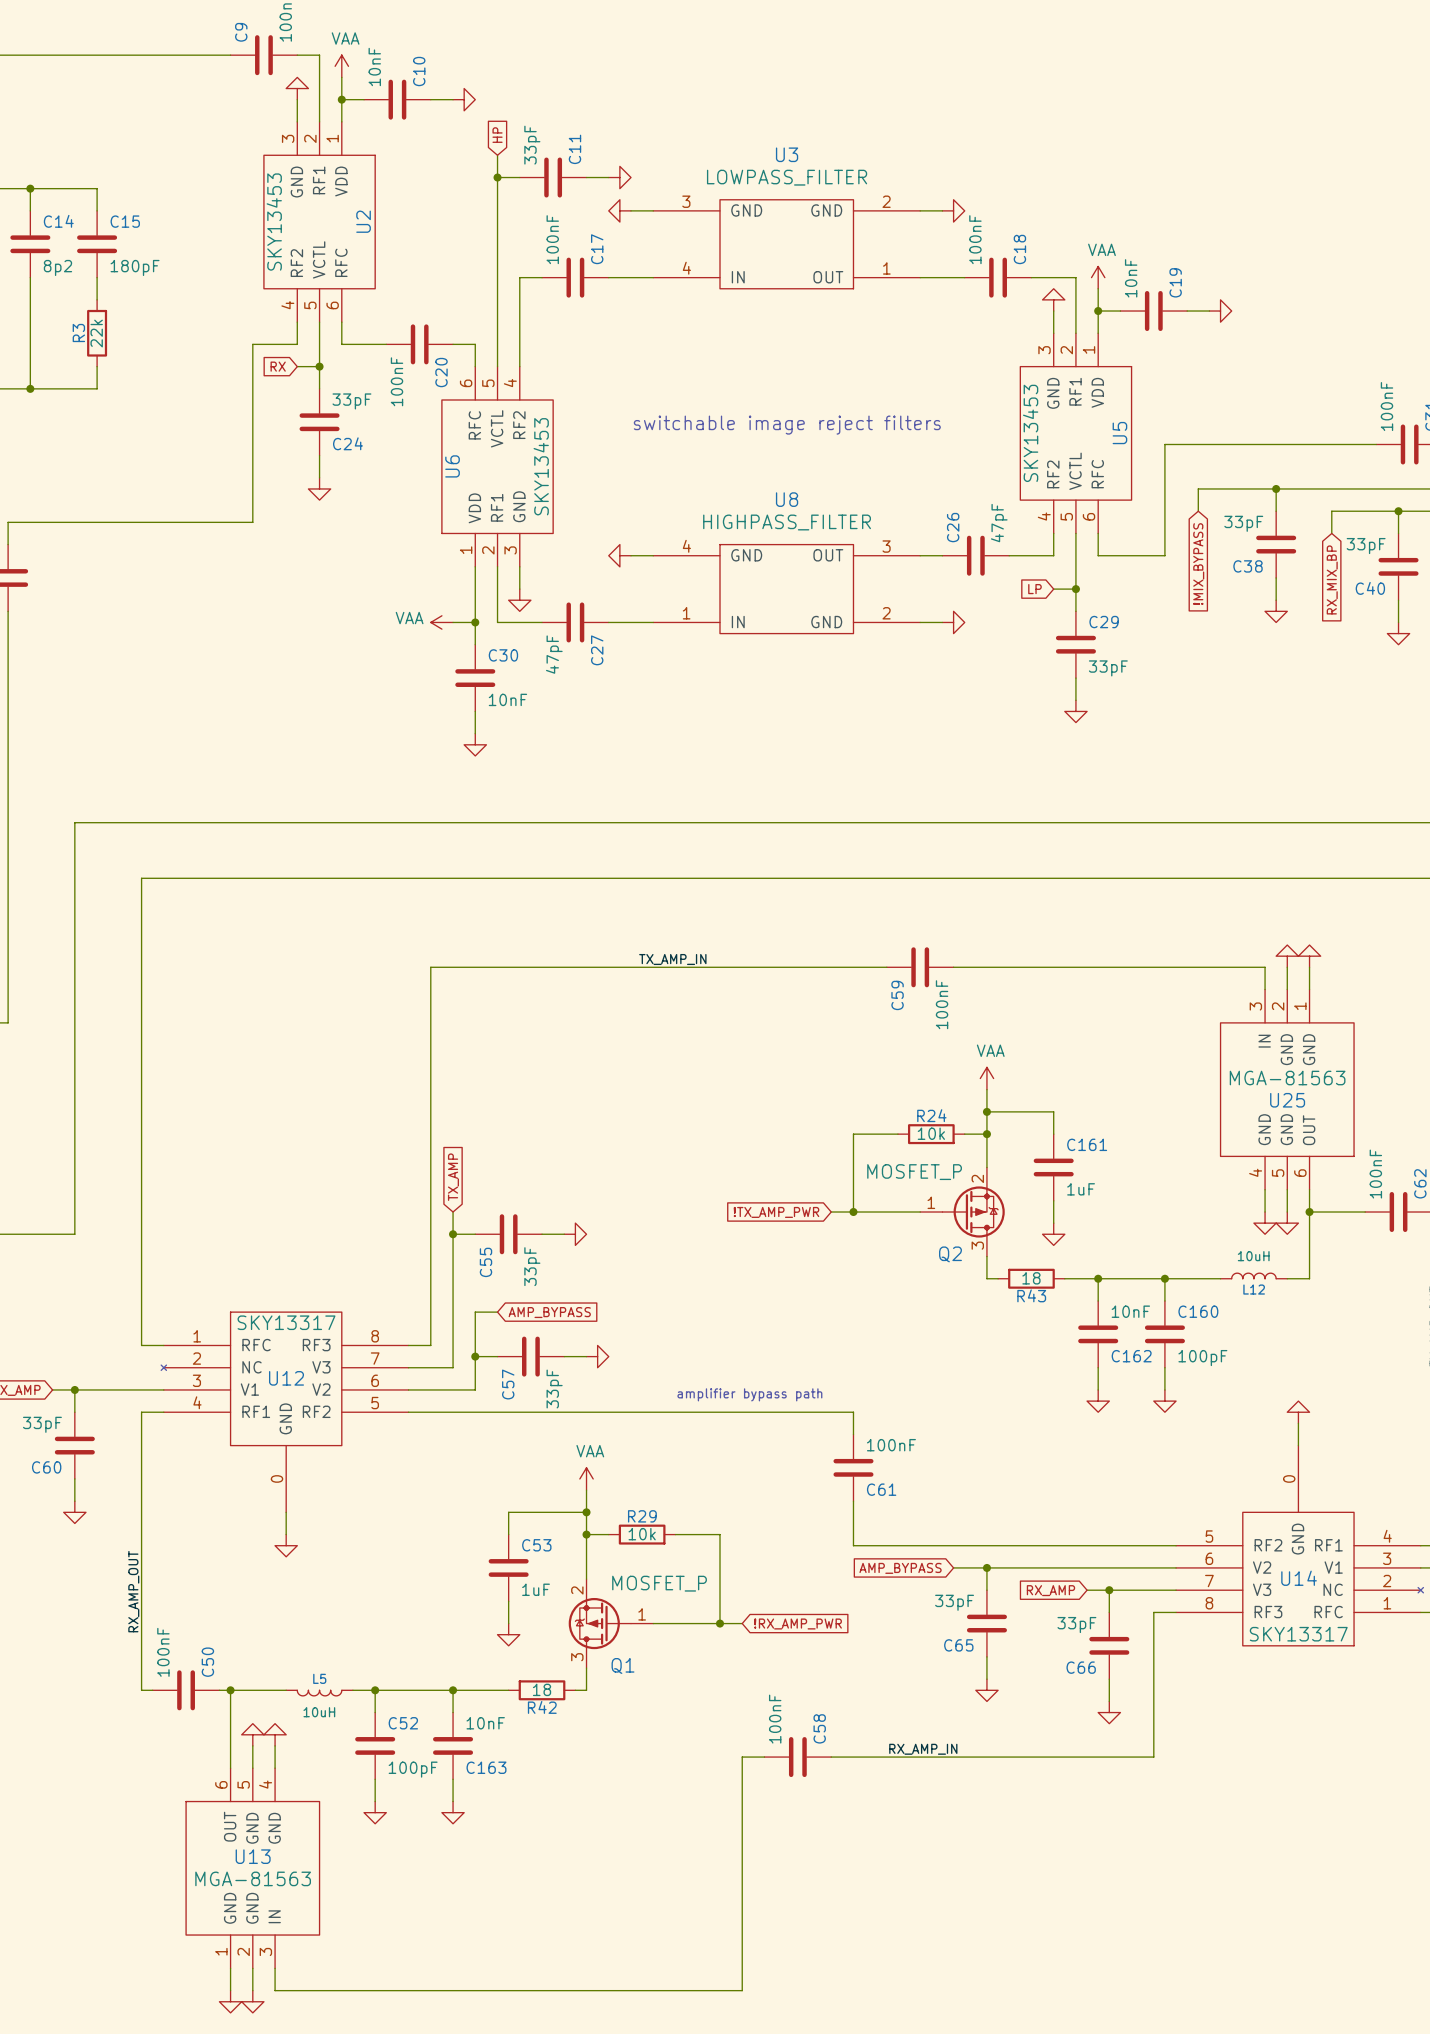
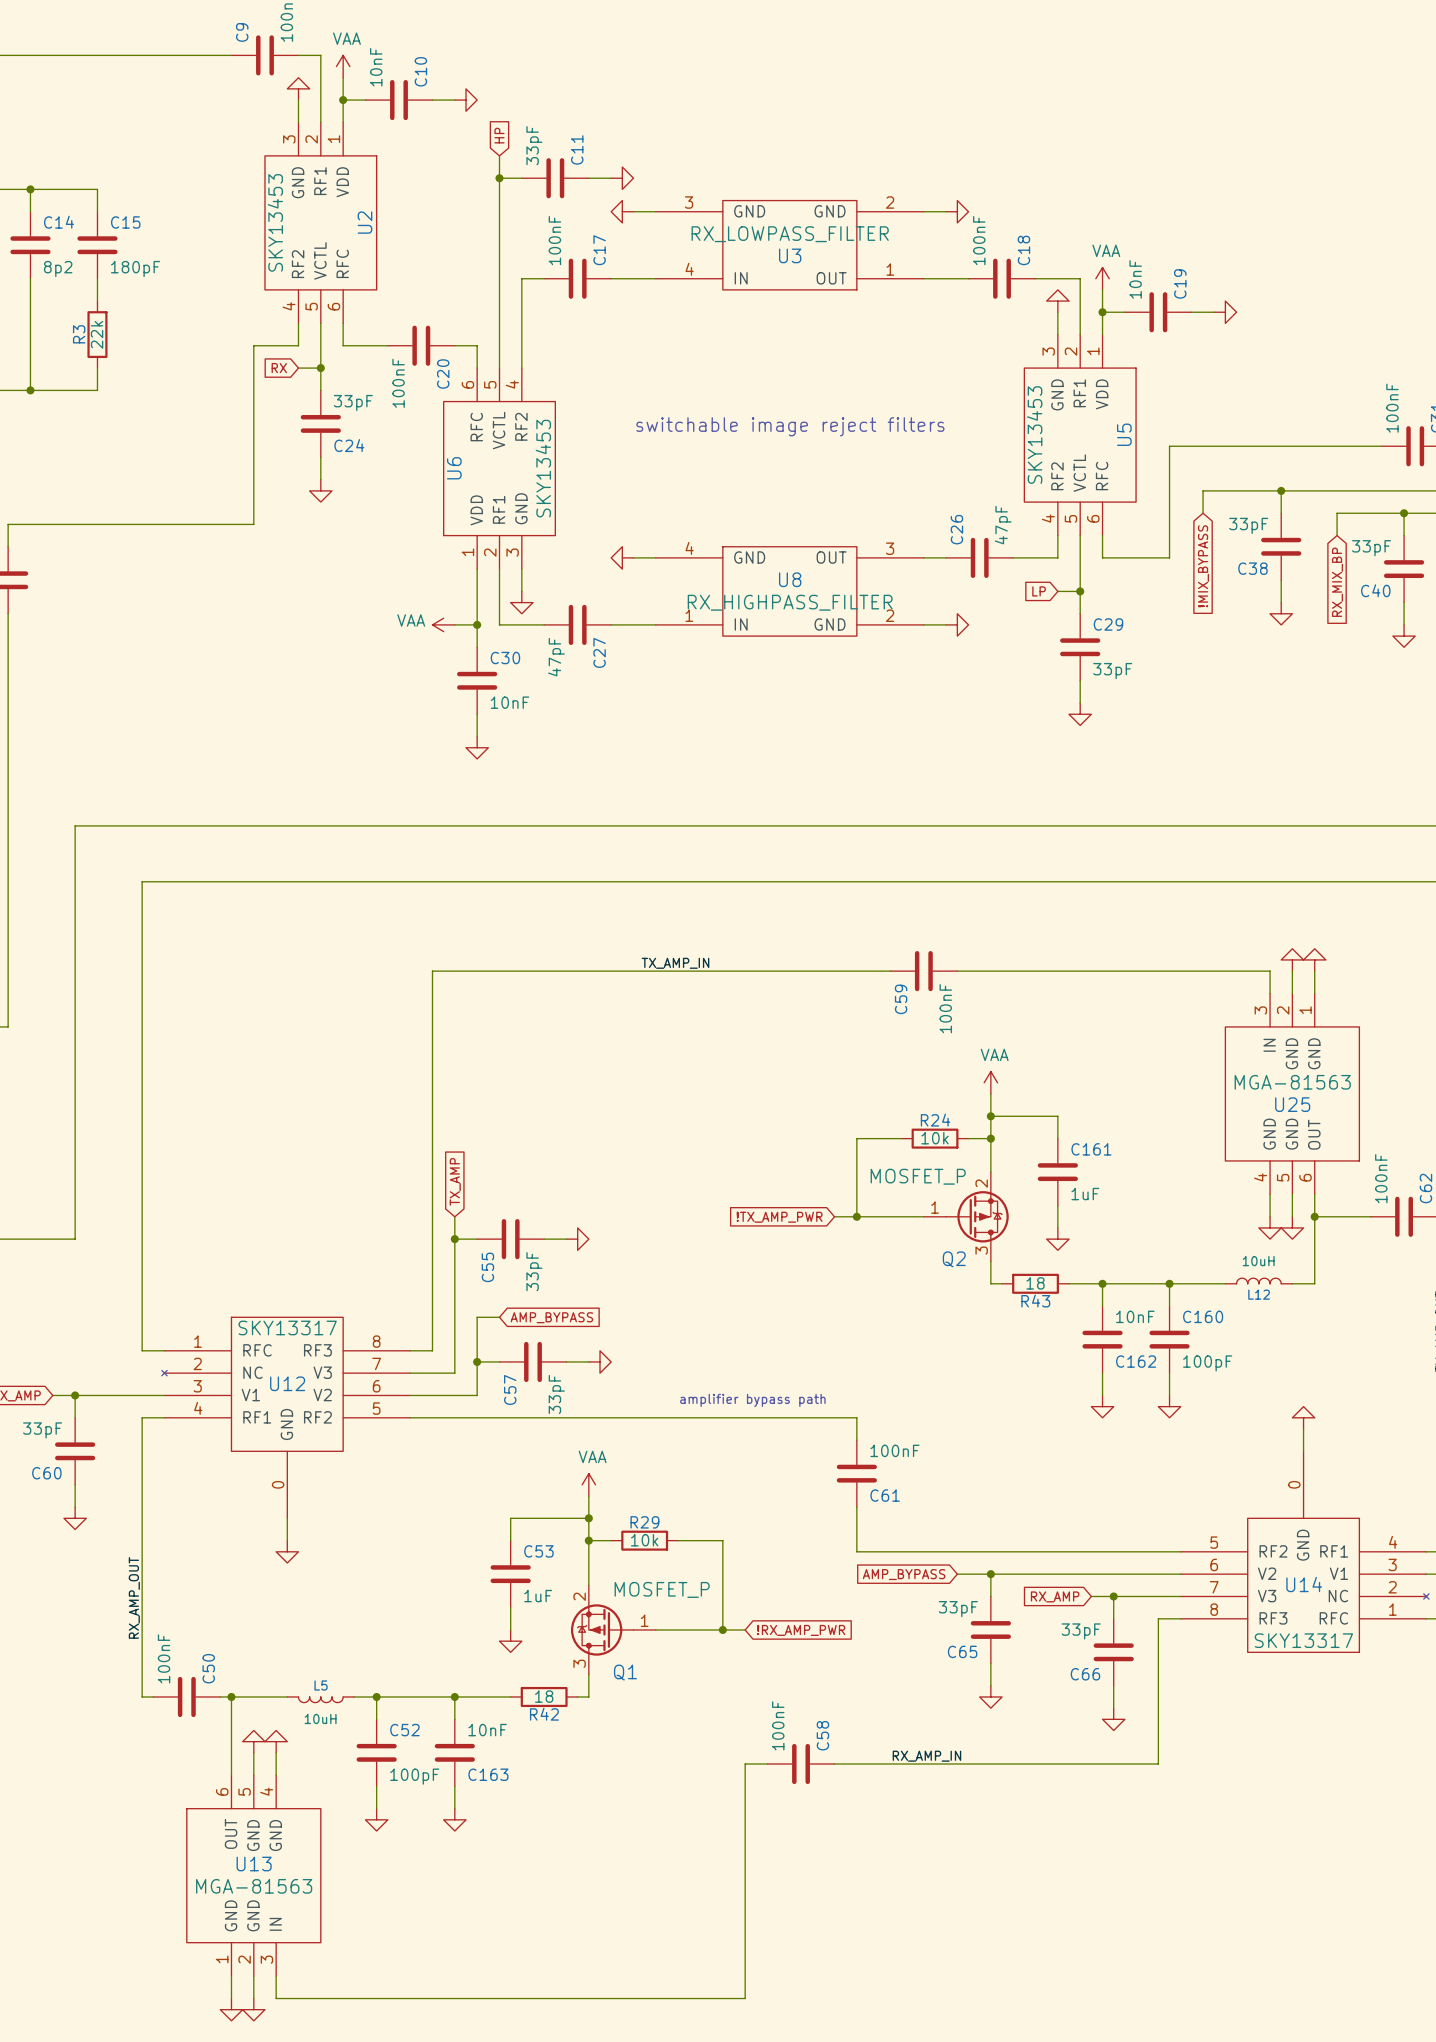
U3 name position: U3 (787, 154) -> U3 (790, 255)
U3 value: LOWPASS_FILTER (787, 177) -> RX_LOWPASS_FILTER (790, 234)
U8 name position: U8 (787, 499) -> U8 (790, 579)
U8 value: HIGHPASS_FILTER (787, 522) -> RX_HIGHPASS_FILTER (790, 602)

